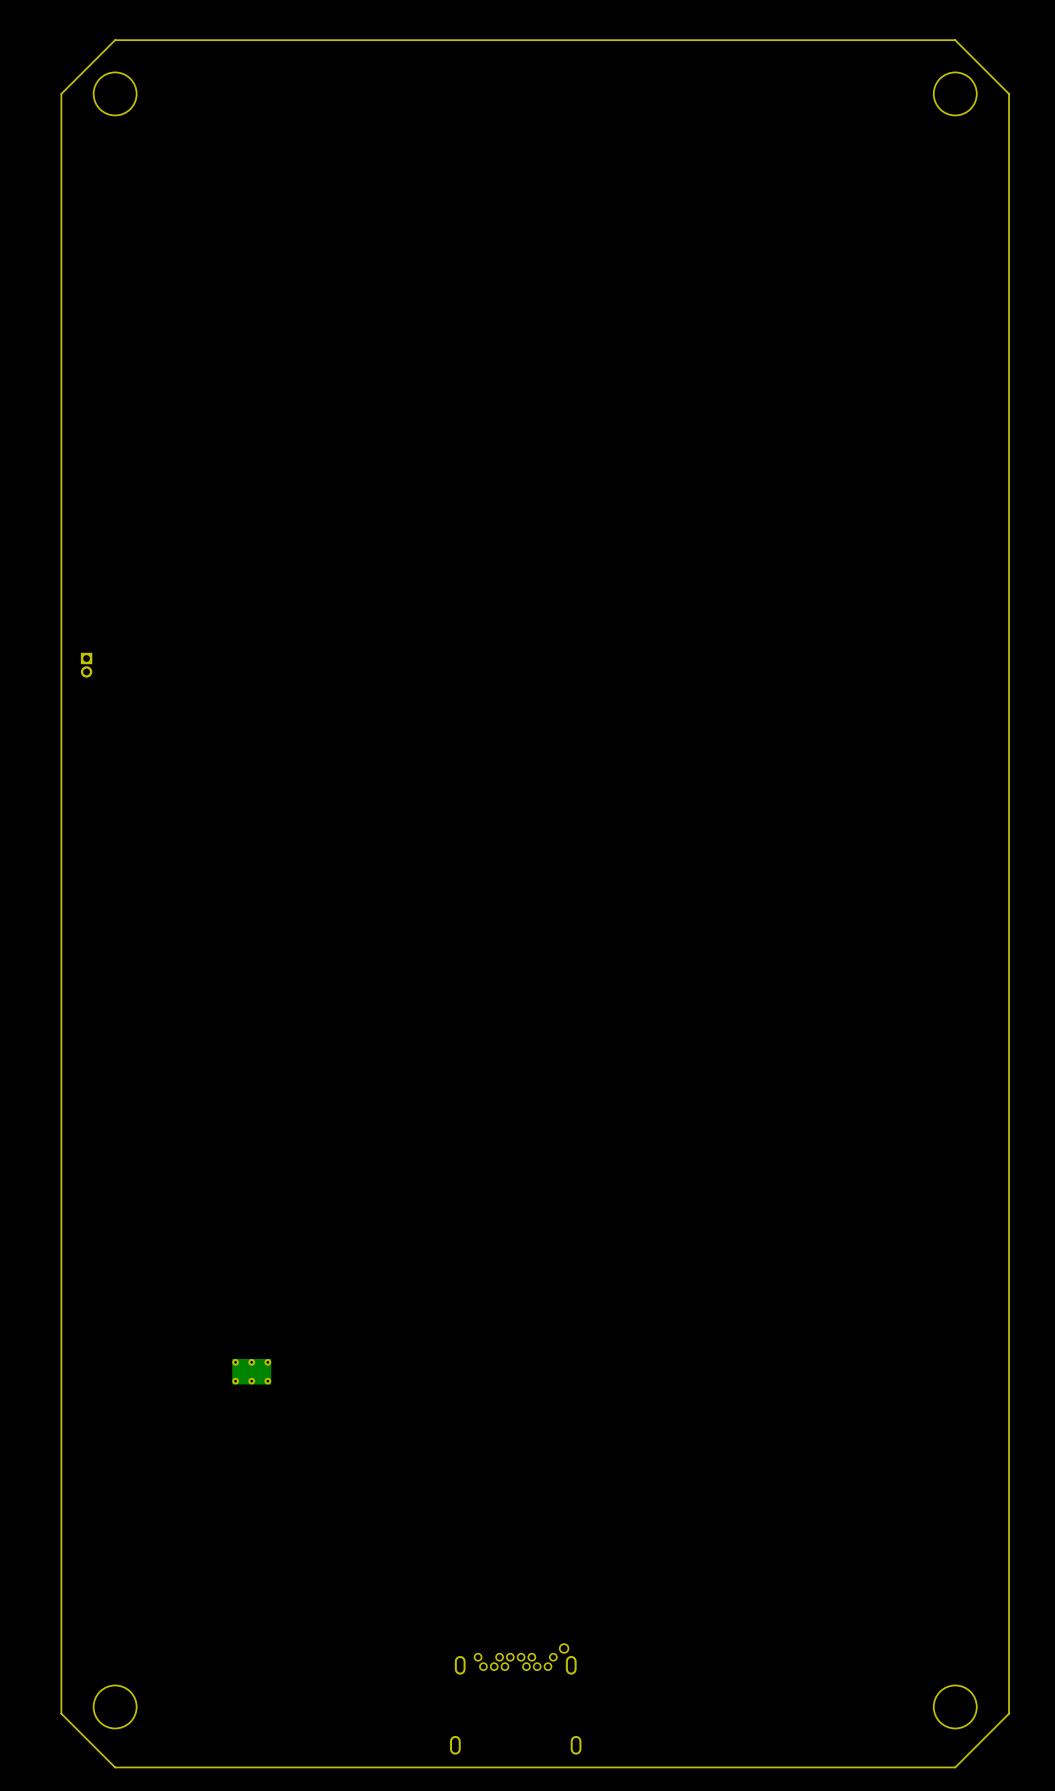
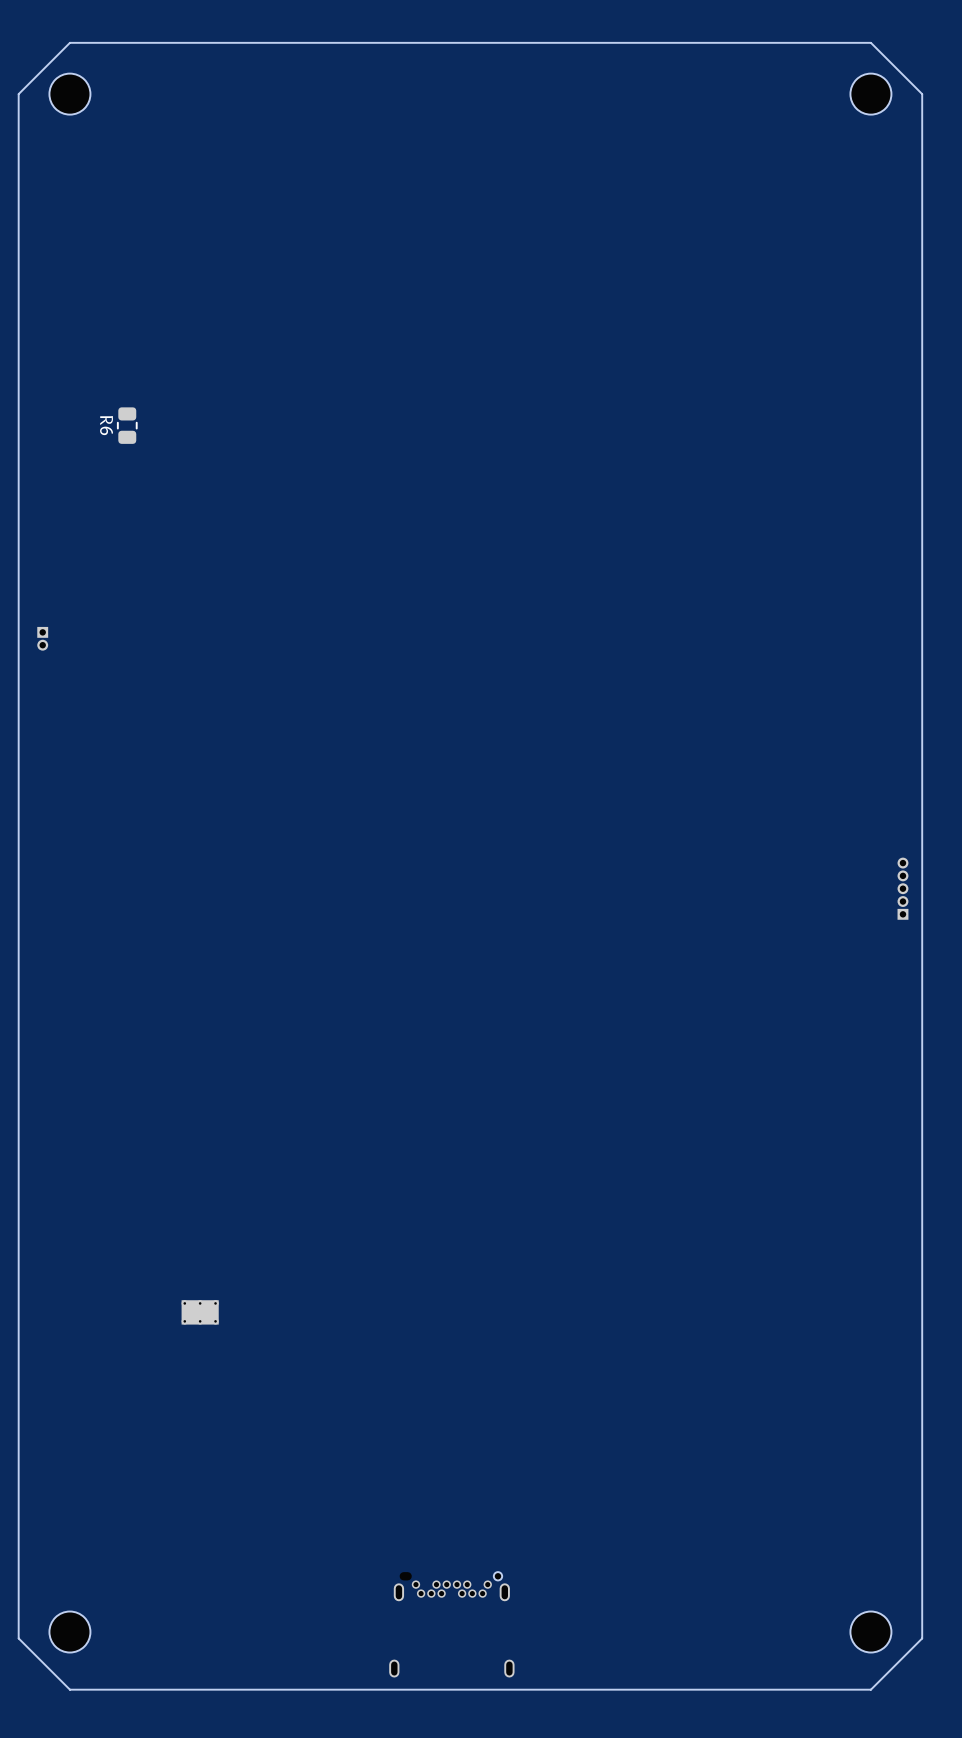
R6: none -> (127, 425)
part: none -> (902, 888)

